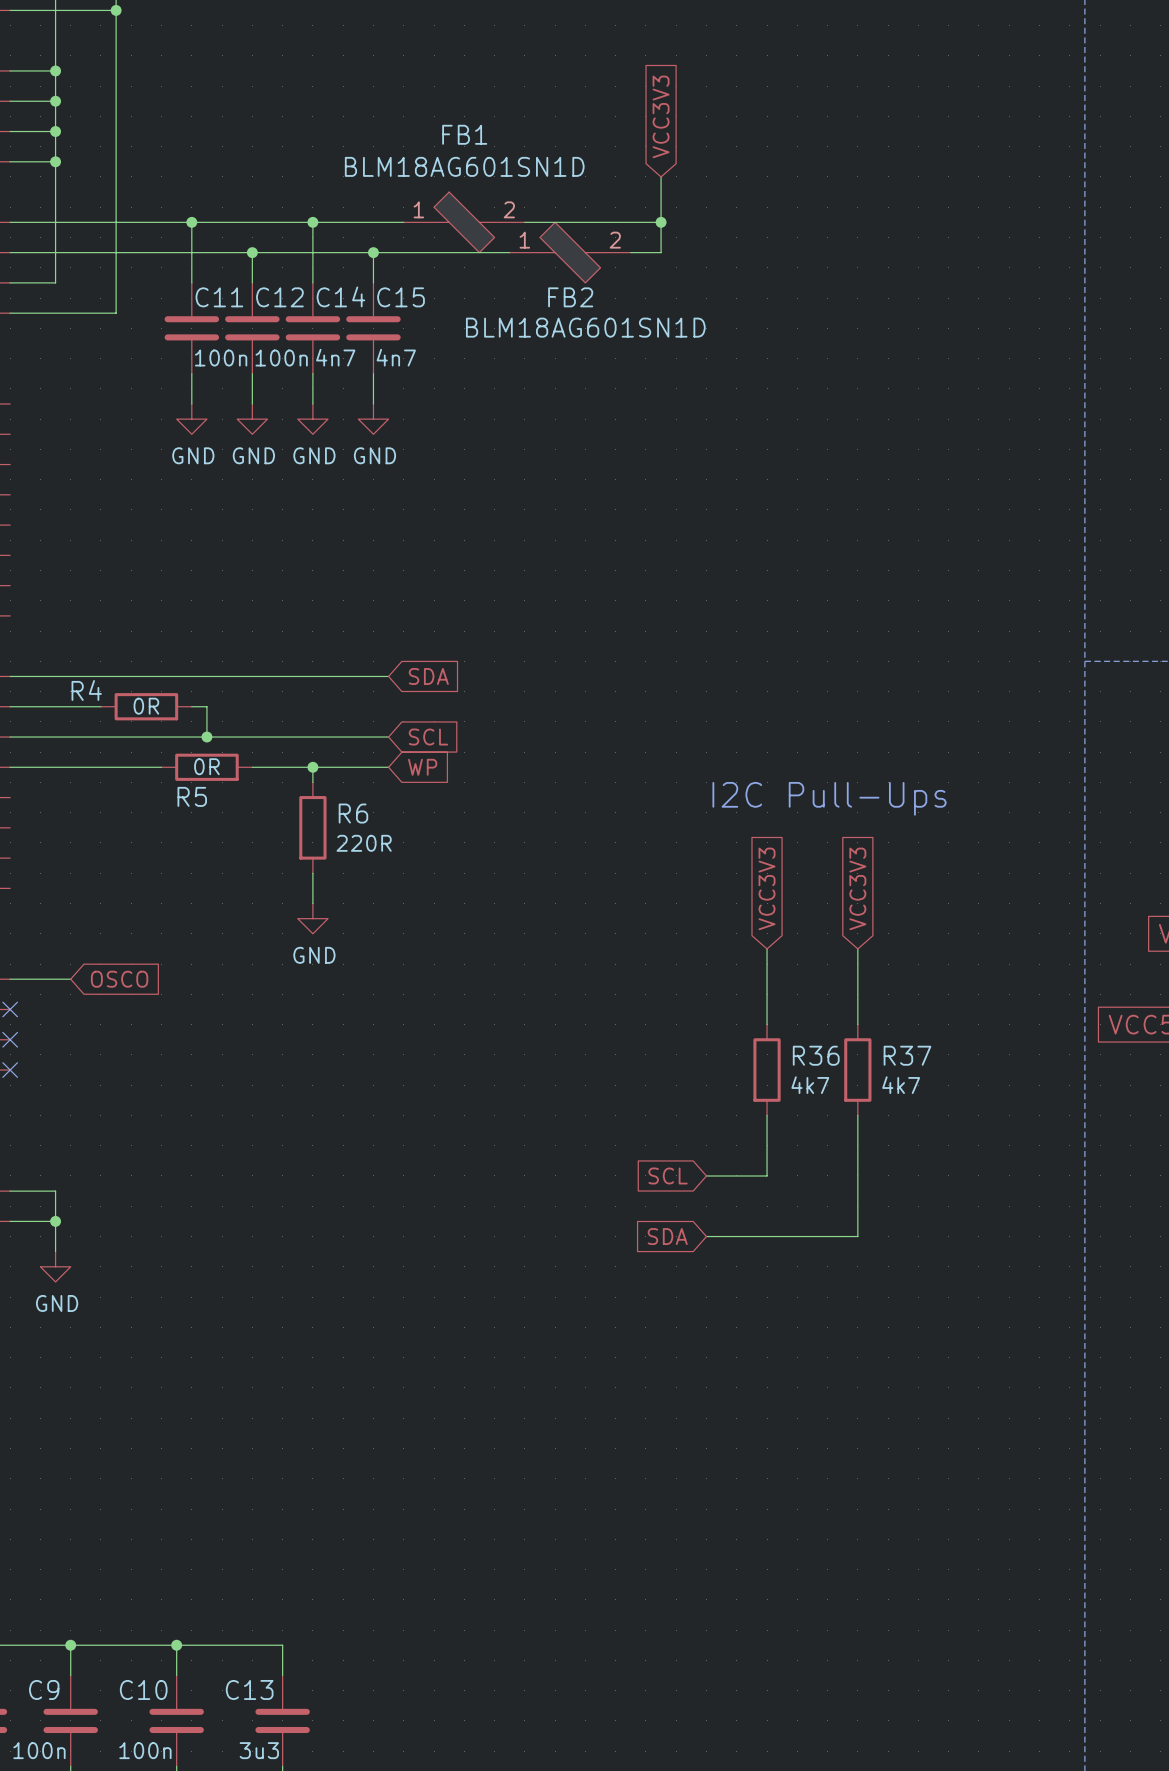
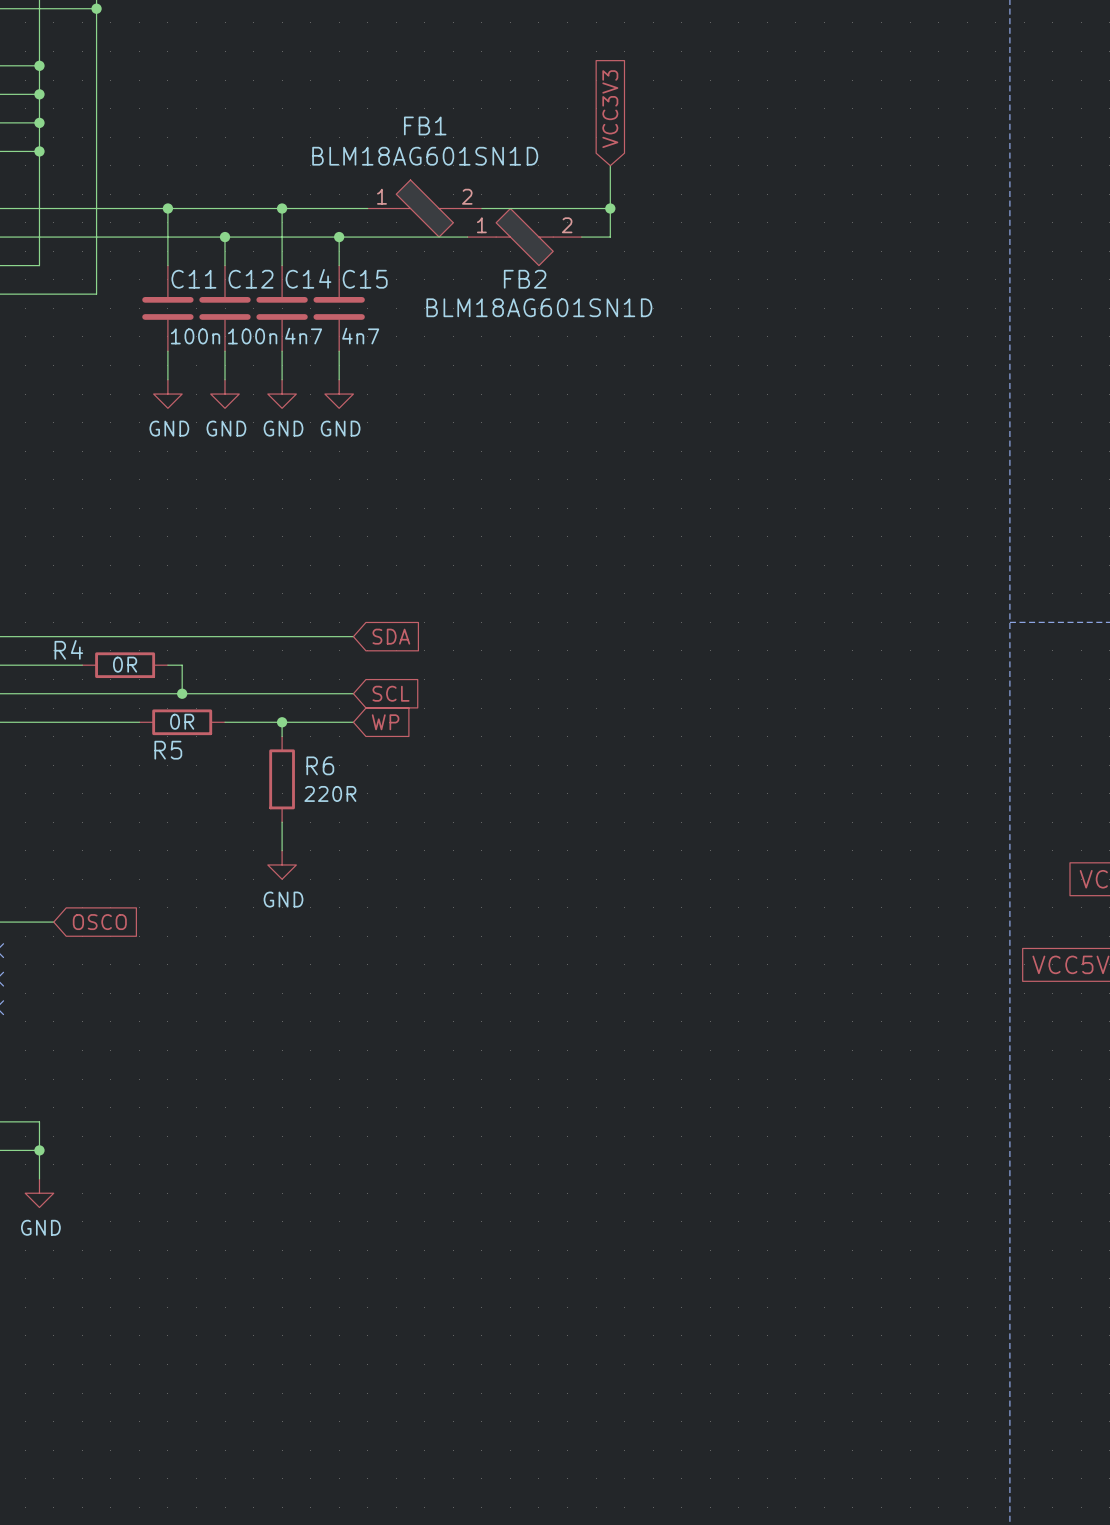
text: I2C Pull-Ups (829, 798) -> none
global label: VCC3V3 (767, 888) -> none
global label: VCC3V3 (857, 888) -> none
wire: (767, 948) (767, 1024) -> none
wire: (857, 948) (857, 1024) -> none
R36: (767, 1070) -> none
R37: (857, 1070) -> none
wire: (767, 1115) (767, 1175) (706, 1175) -> none
wire: (857, 1115) (857, 1236) (706, 1236) -> none
global label: SCL (668, 1175) -> none
global label: SDA (667, 1236) -> none

